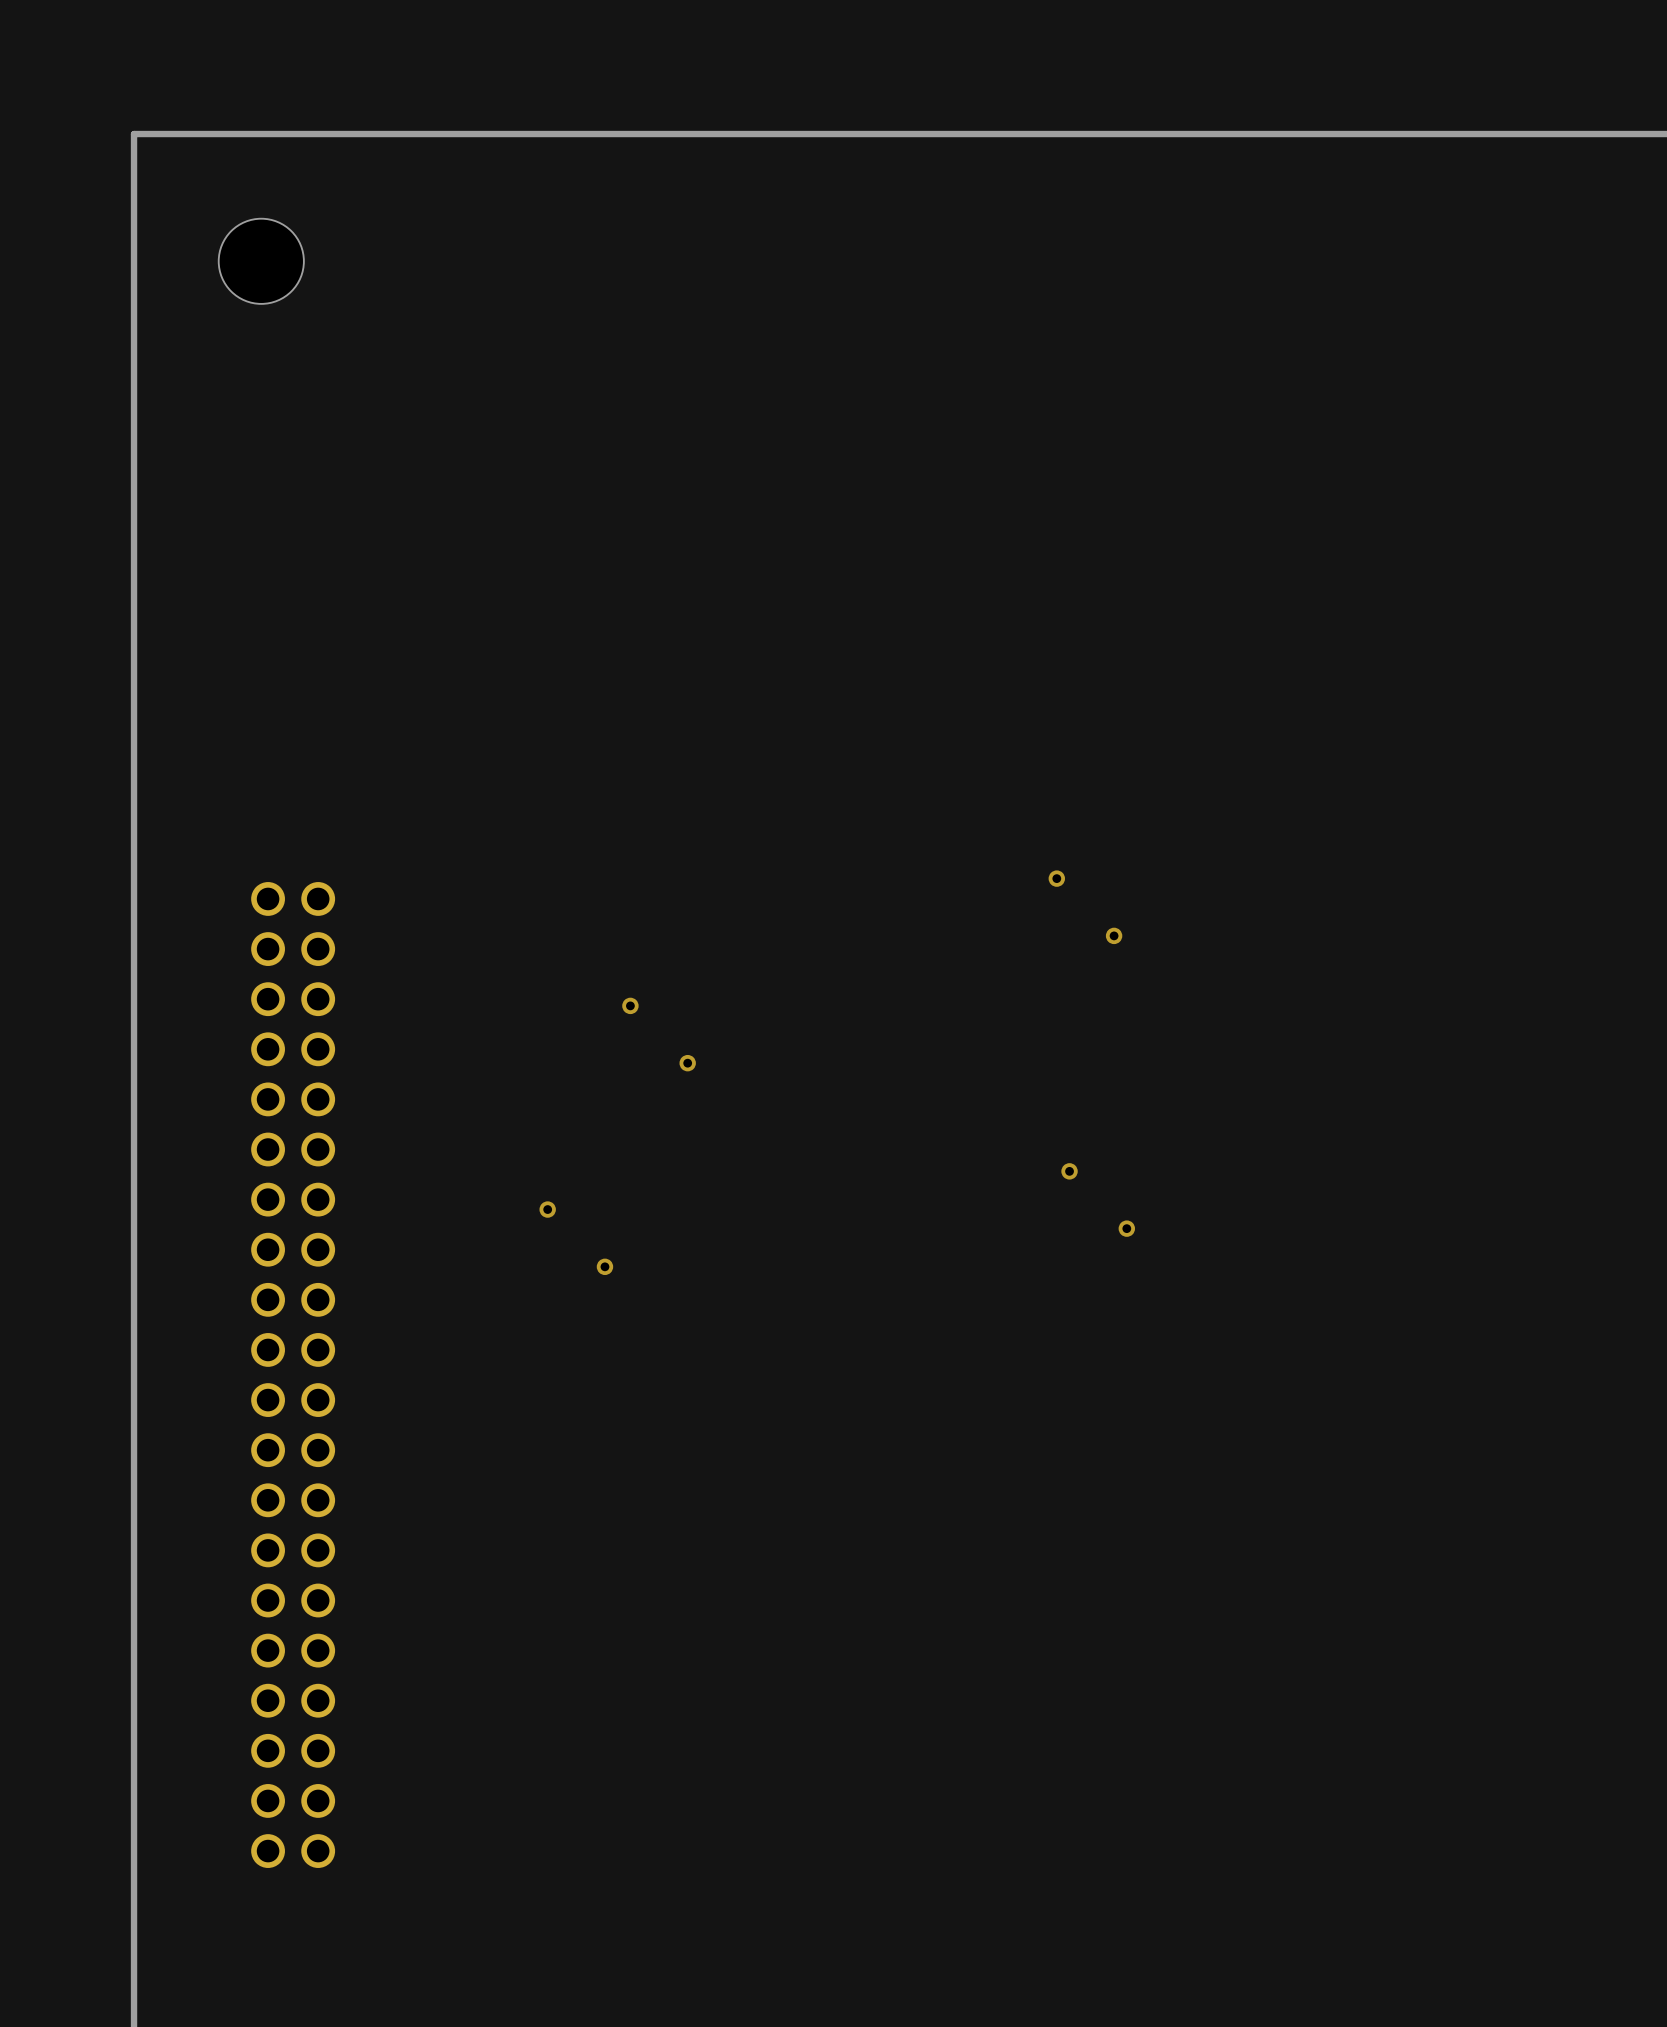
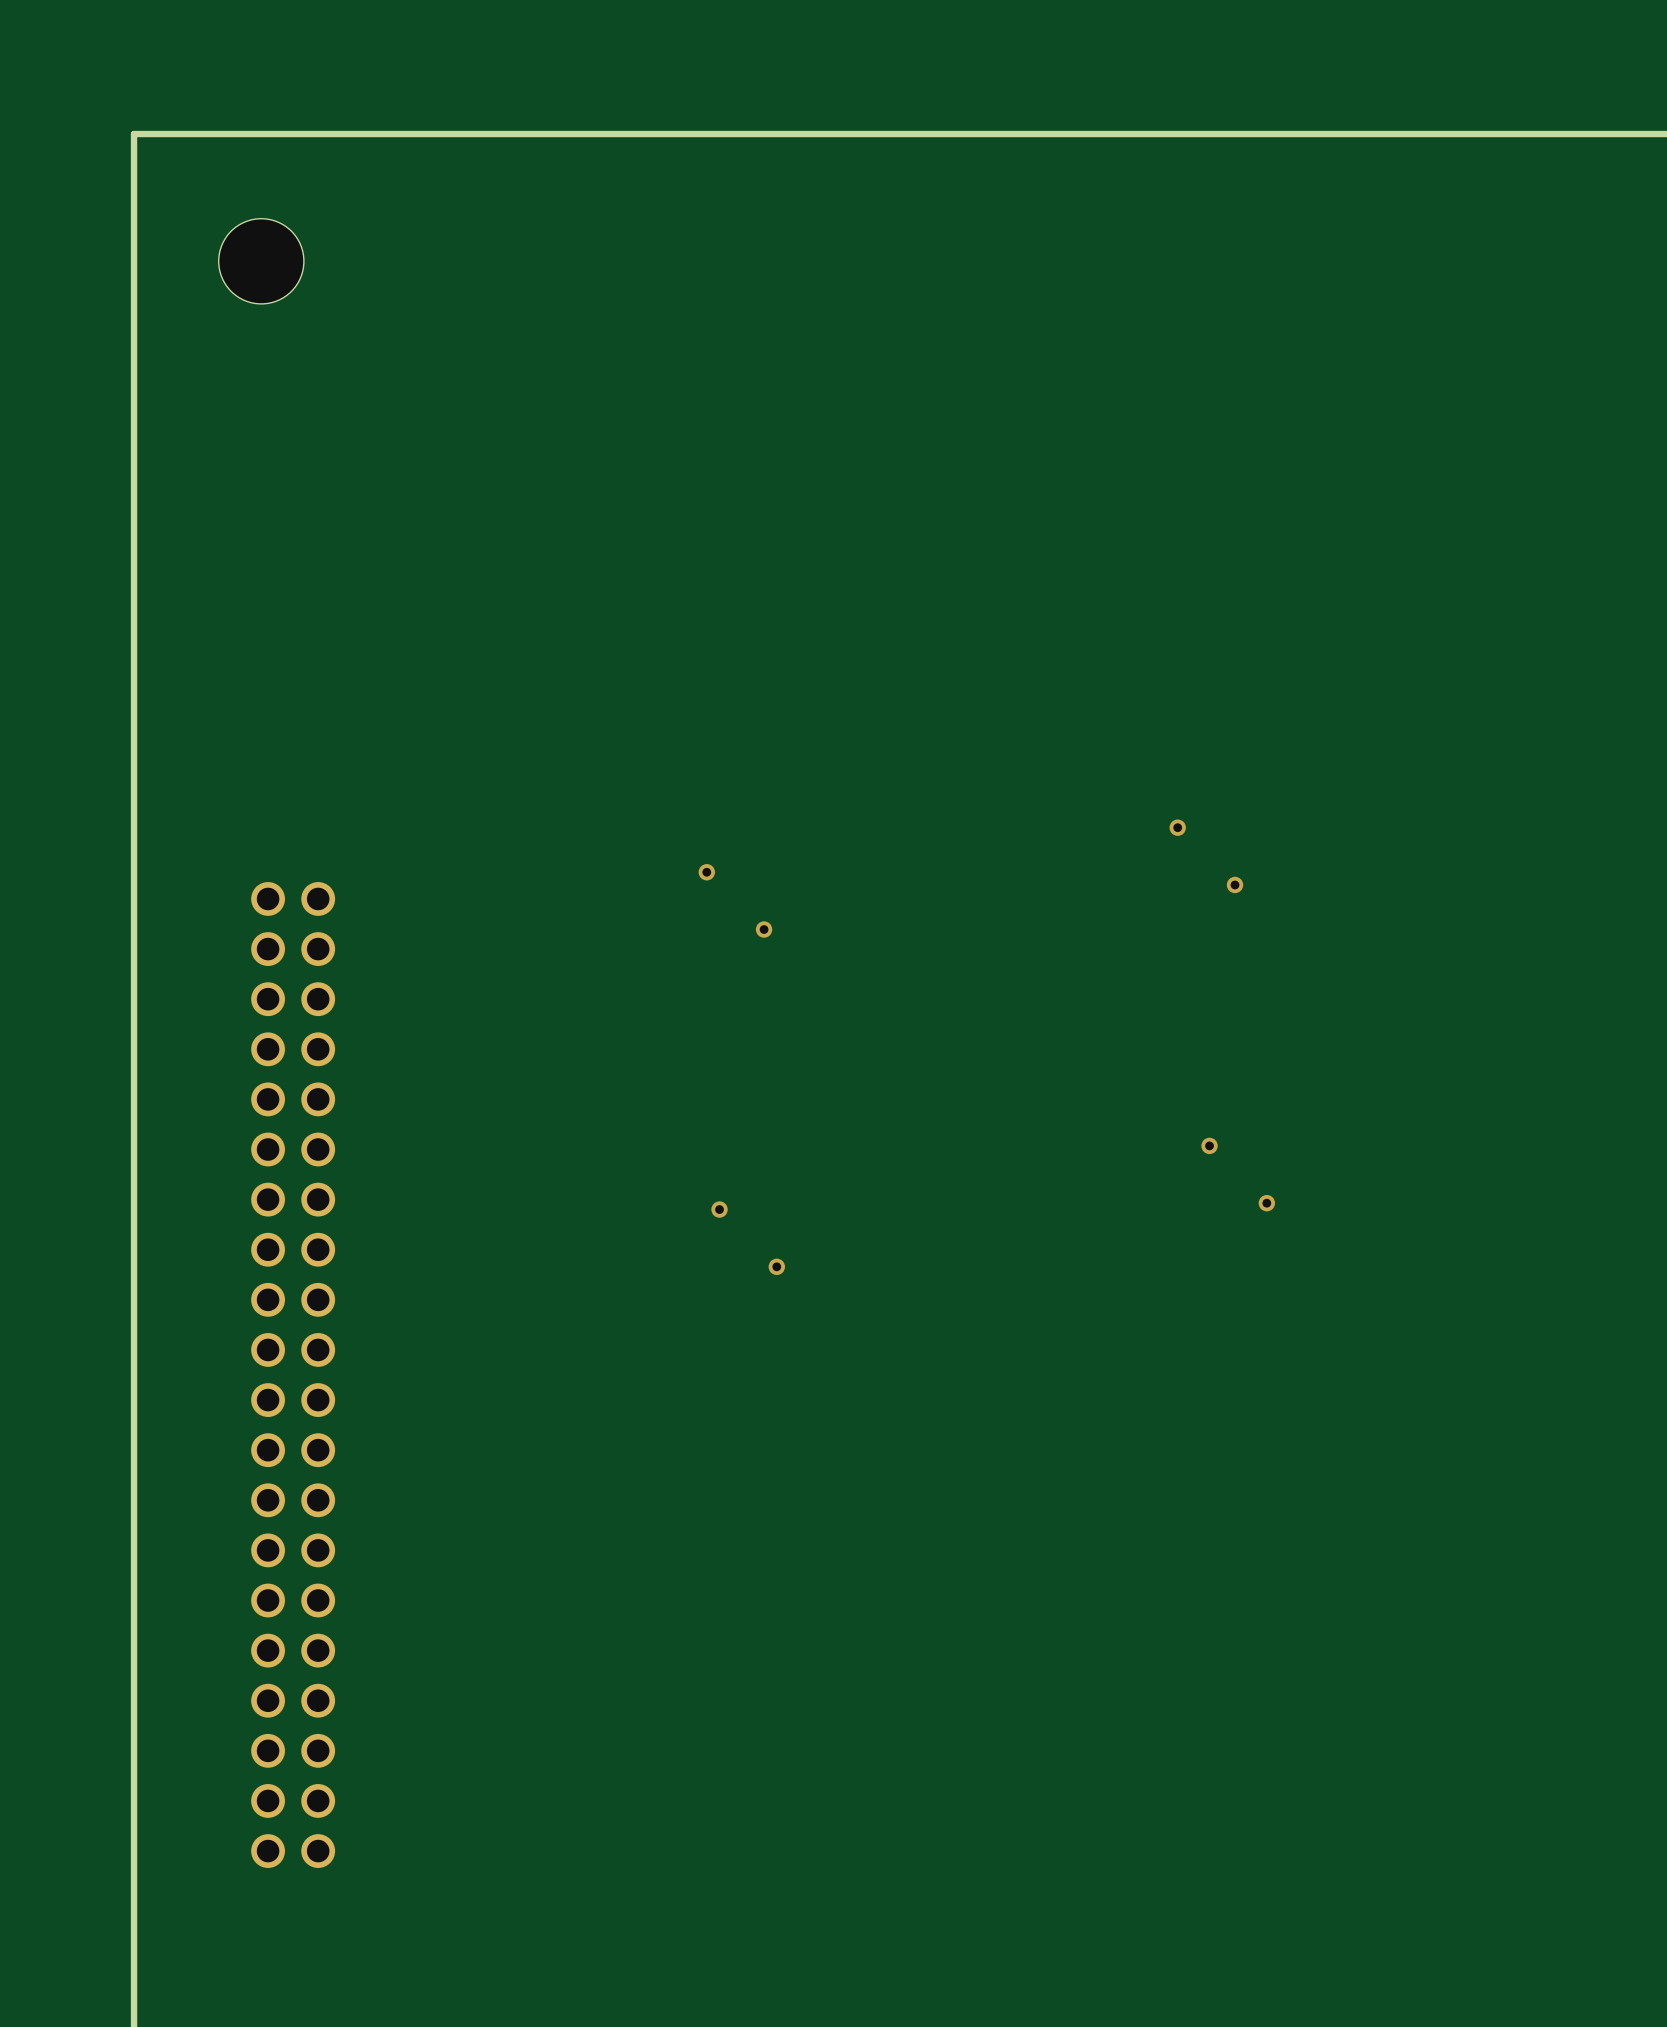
via: none -> (1177, 827)
via: none -> (706, 872)
via: (1056, 878) -> none
via: none -> (1235, 884)
via: none -> (764, 929)
via: (1114, 935) -> none
via: (630, 1005) -> none
via: (687, 1063) -> none
via: none -> (1209, 1145)
via: (1069, 1171) -> none
via: none -> (1266, 1203)
via: (547, 1209) -> none
via: none -> (719, 1209)
via: (1126, 1228) -> none
via: (604, 1266) -> none
via: none -> (776, 1266)

